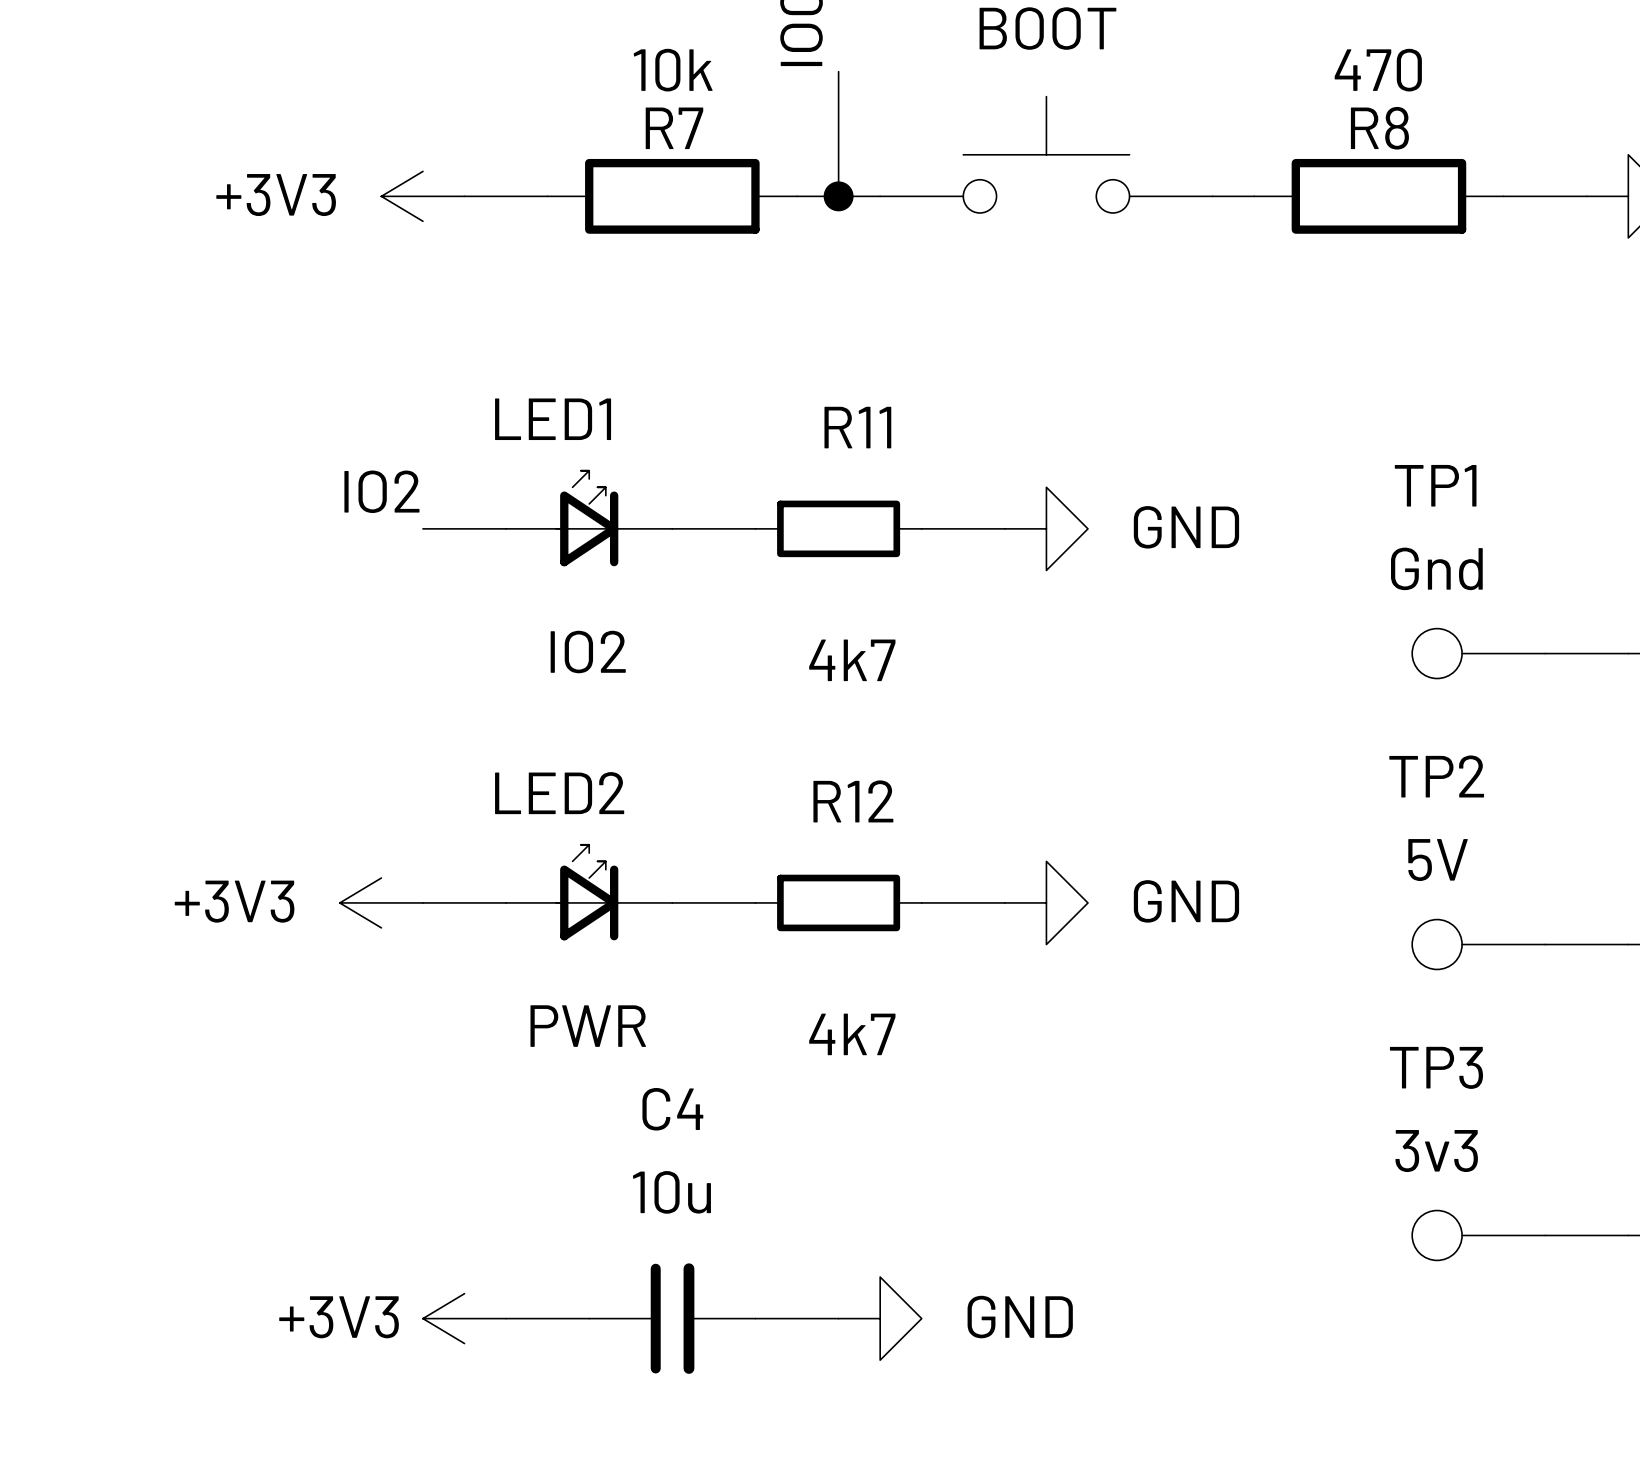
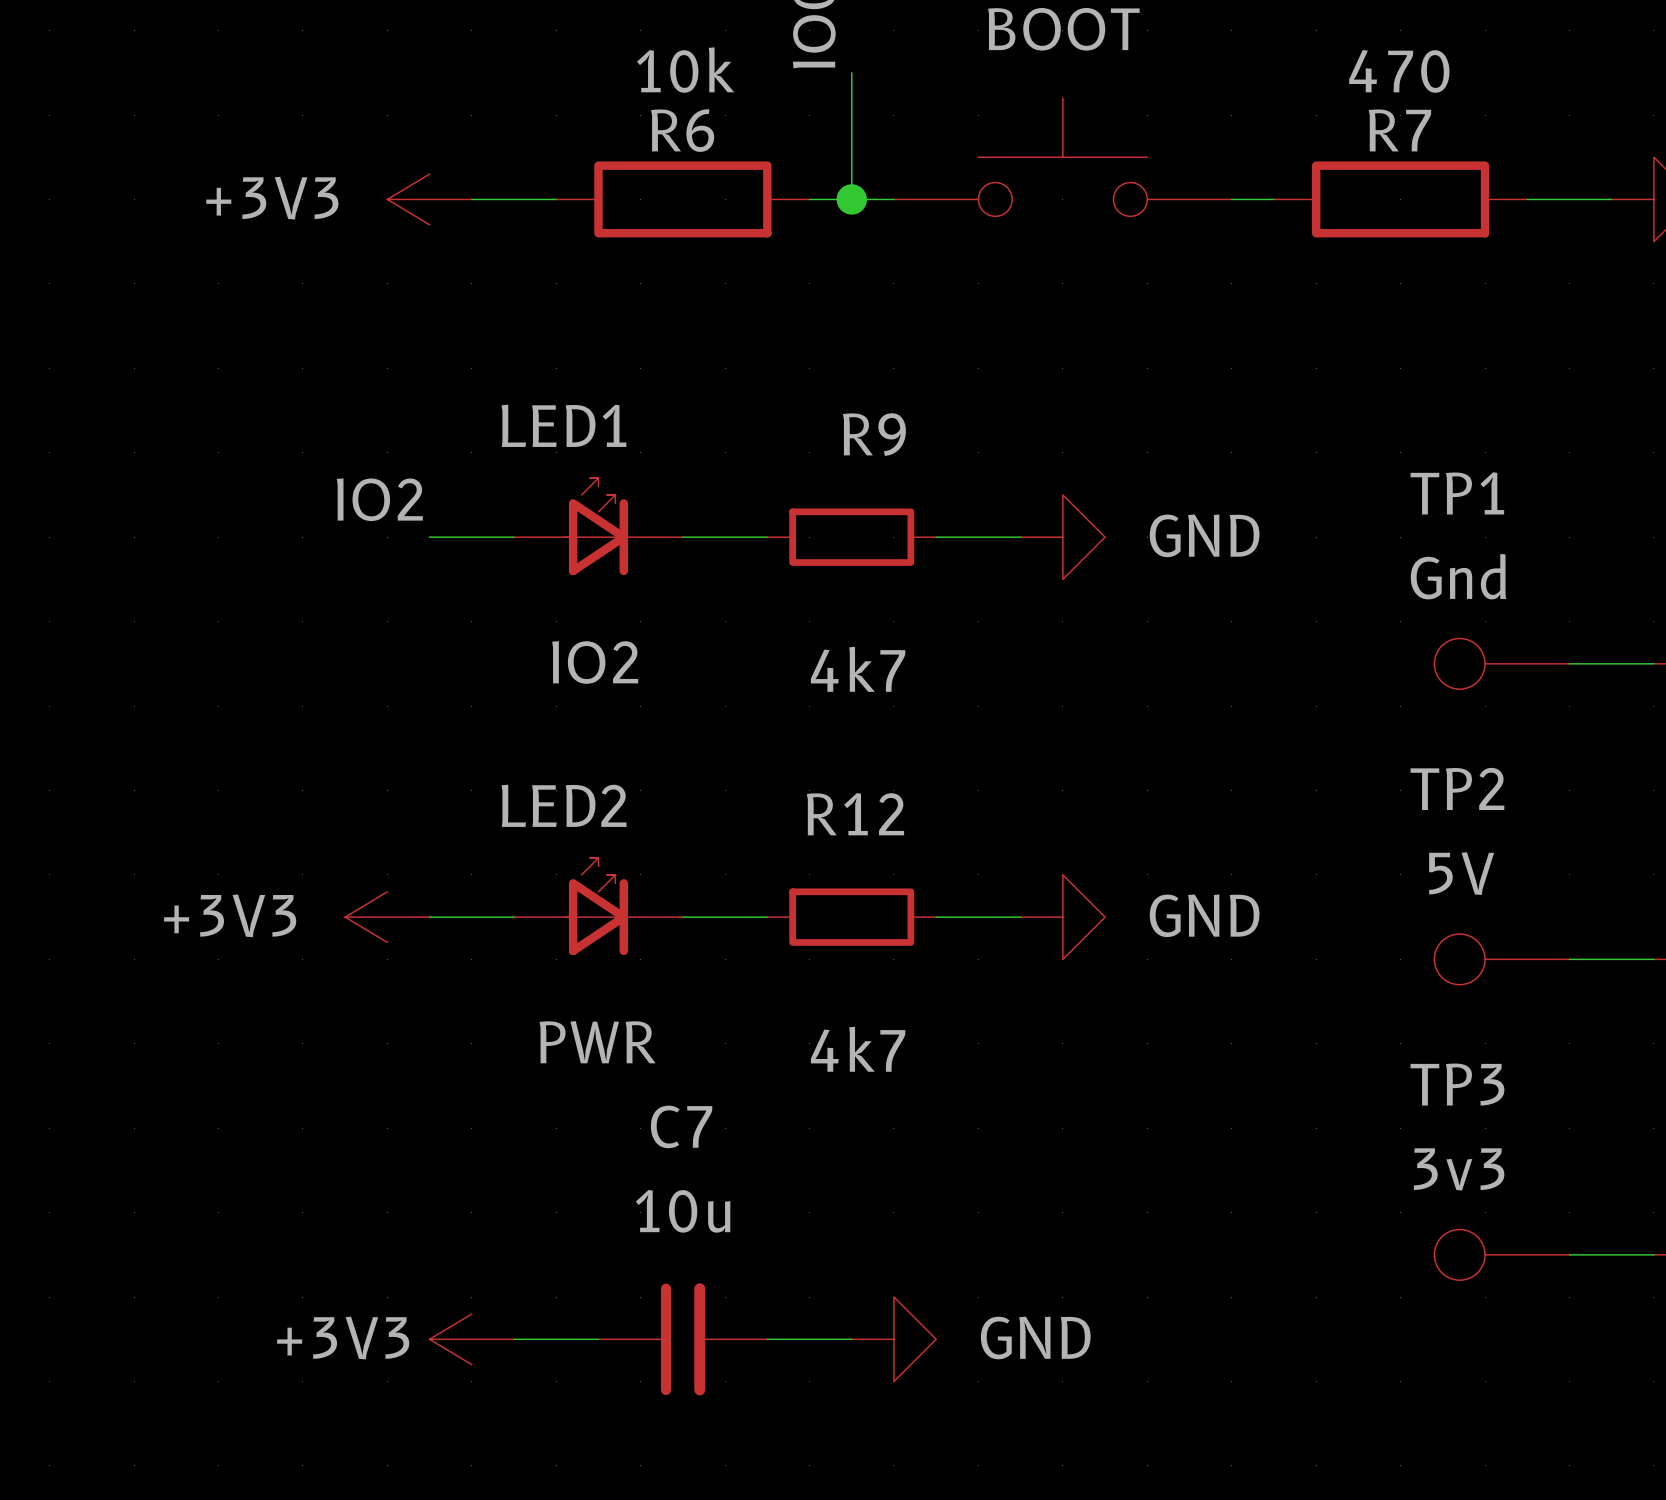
R7 name: R7 (674, 128) -> R6 (682, 130)
R8 name: R8 (1379, 128) -> R7 (1399, 130)
R11 name: R11 (857, 427) -> R9 (874, 434)
C4 name: C4 (672, 1109) -> C7 (681, 1126)

